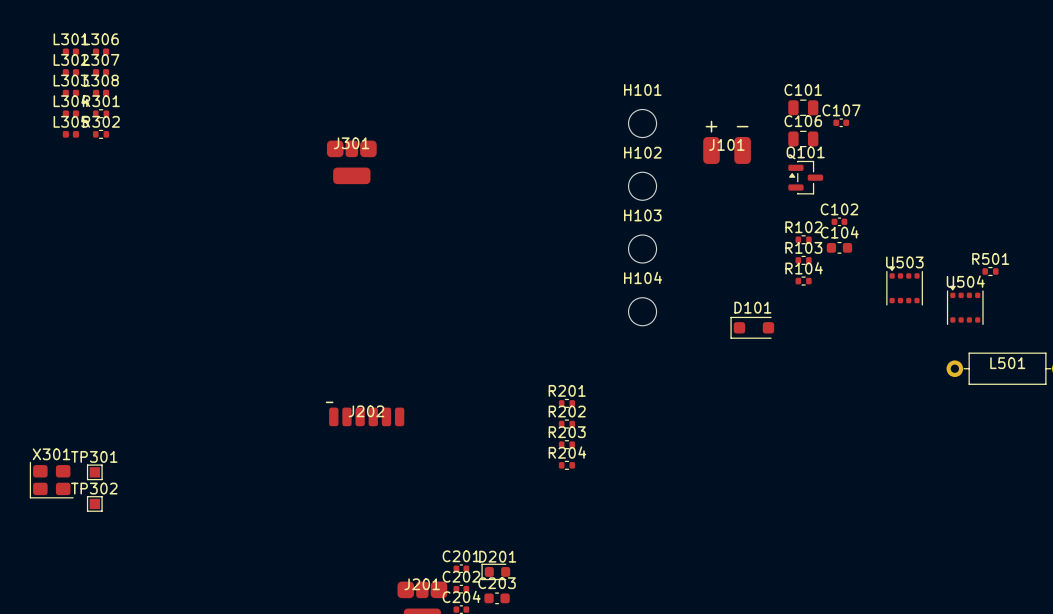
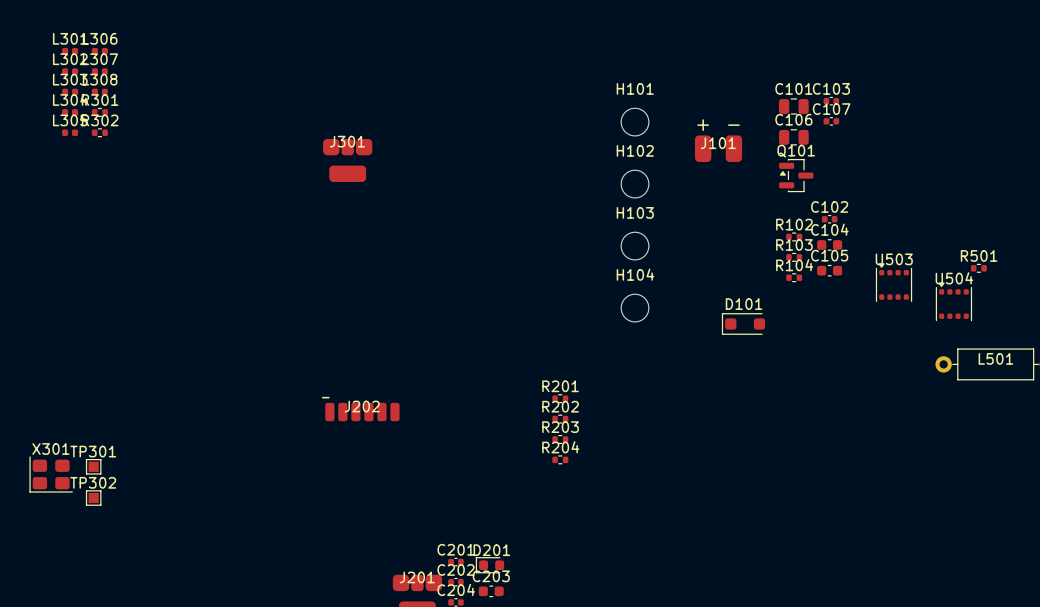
C103: none -> (831, 101)
C105: none -> (829, 270)

